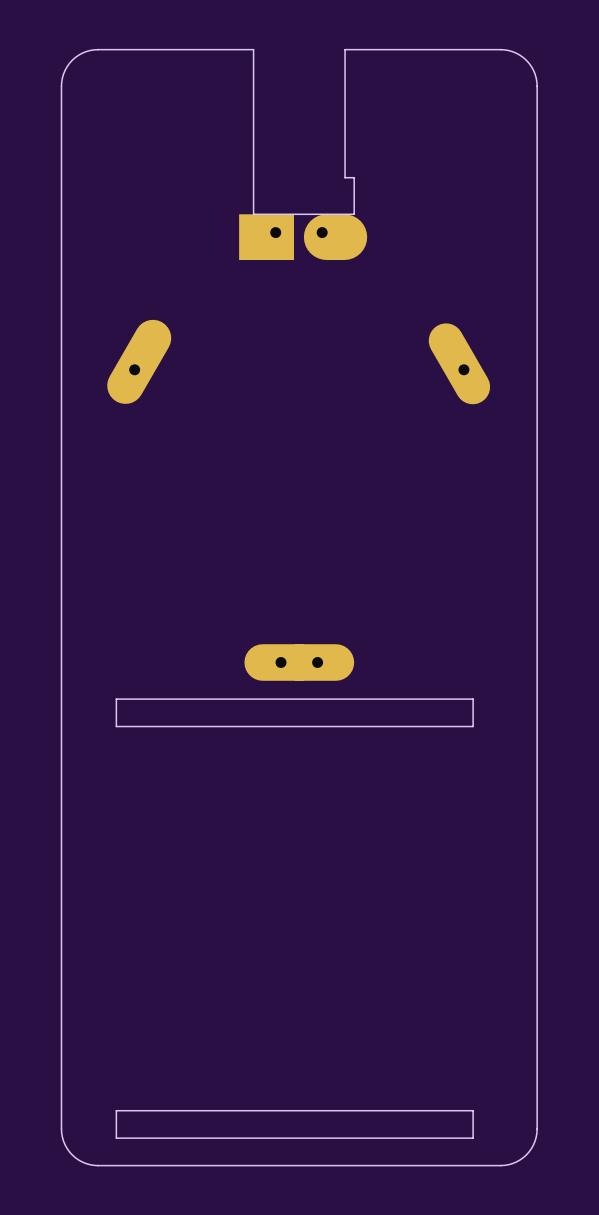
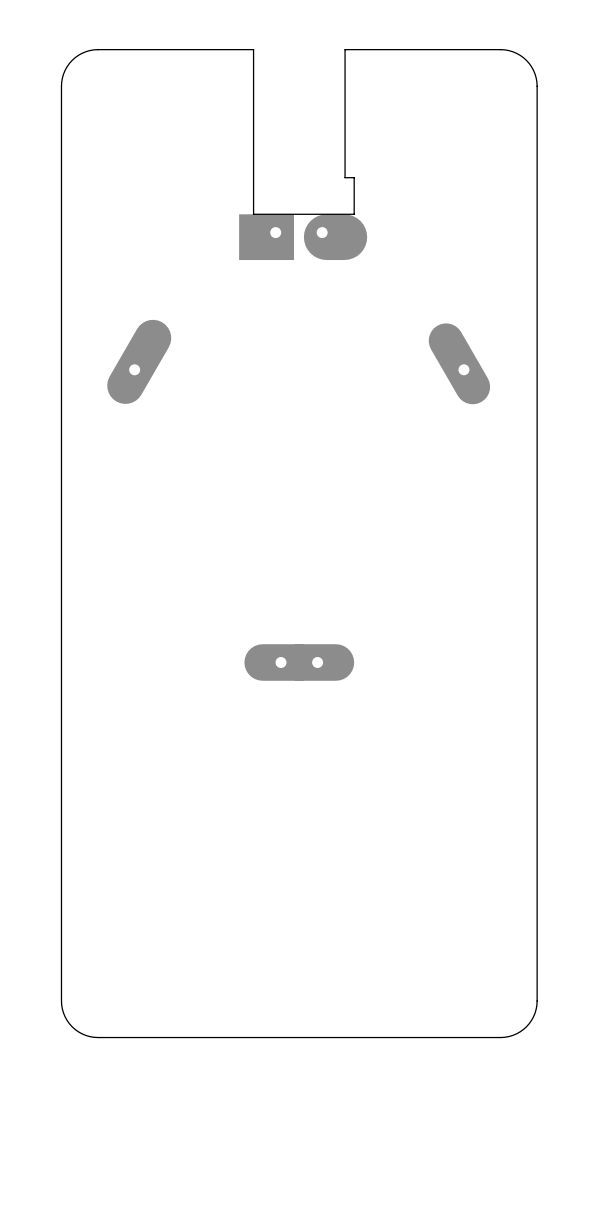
board edge: (473, 699) (116, 699) (116, 726) (473, 726) (473, 699) -> none
board edge: (537, 1000) (536, 1137) (531, 1148) (523, 1157) (512, 1163) (500, 1165) (98, 1165) (85, 1163) (69, 1151) (61, 1133) (61, 1000) -> (537, 1000) (535, 1013) (526, 1026) (516, 1033) (500, 1037) (93, 1037) (78, 1031) (69, 1023) (63, 1013) (61, 1000)
board edge: (473, 1110) (473, 1138) (116, 1138) (116, 1110) (473, 1110) -> none

